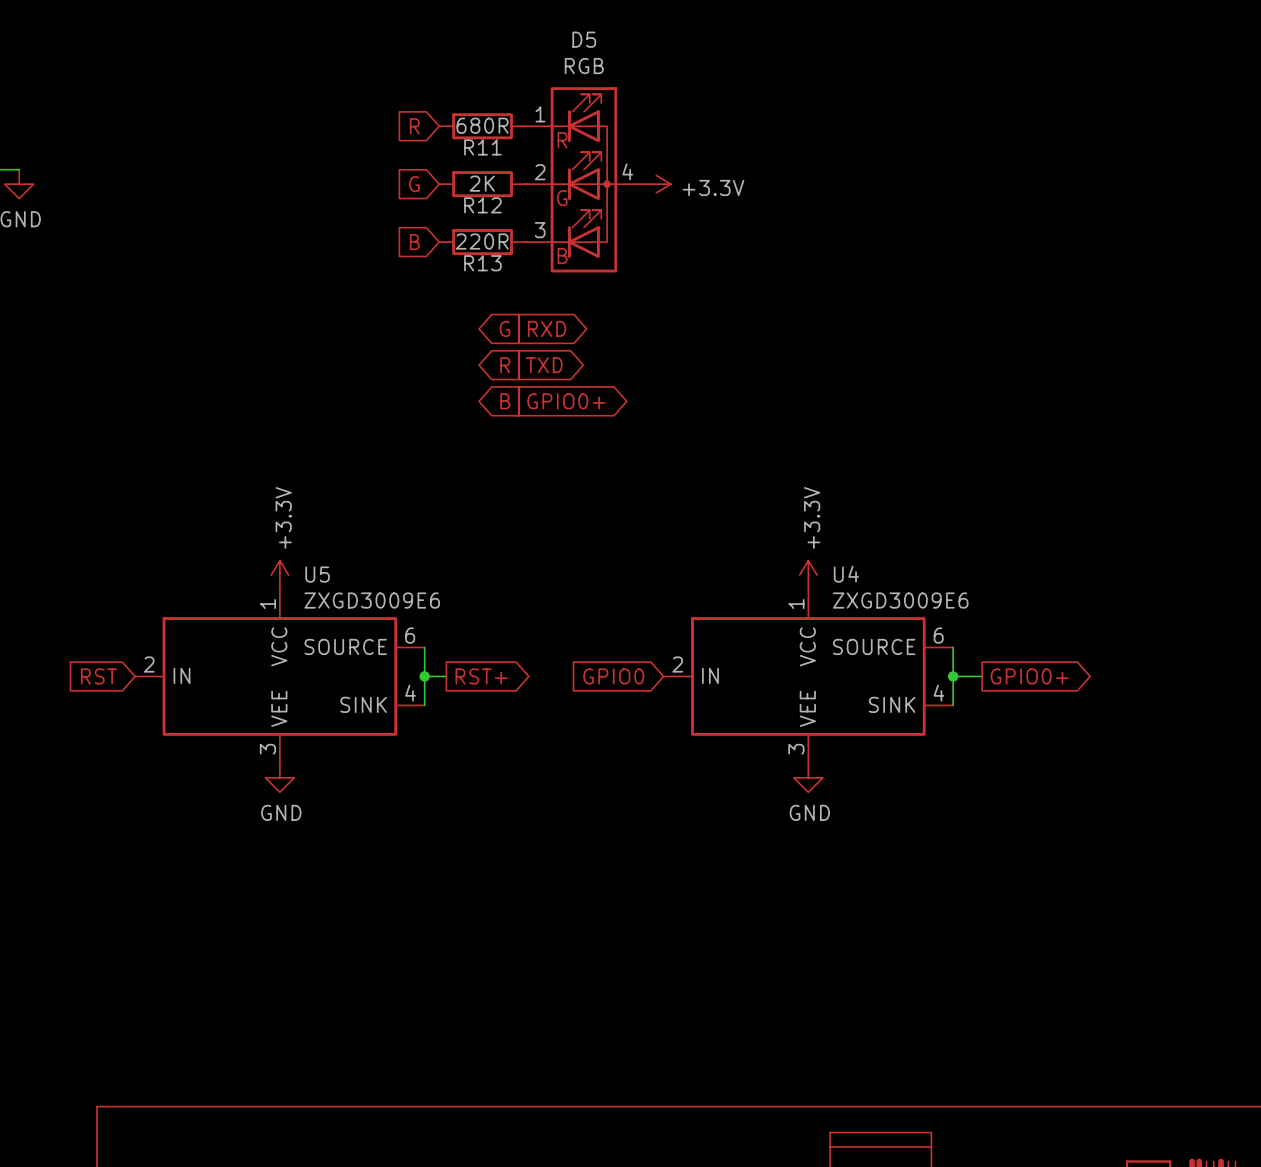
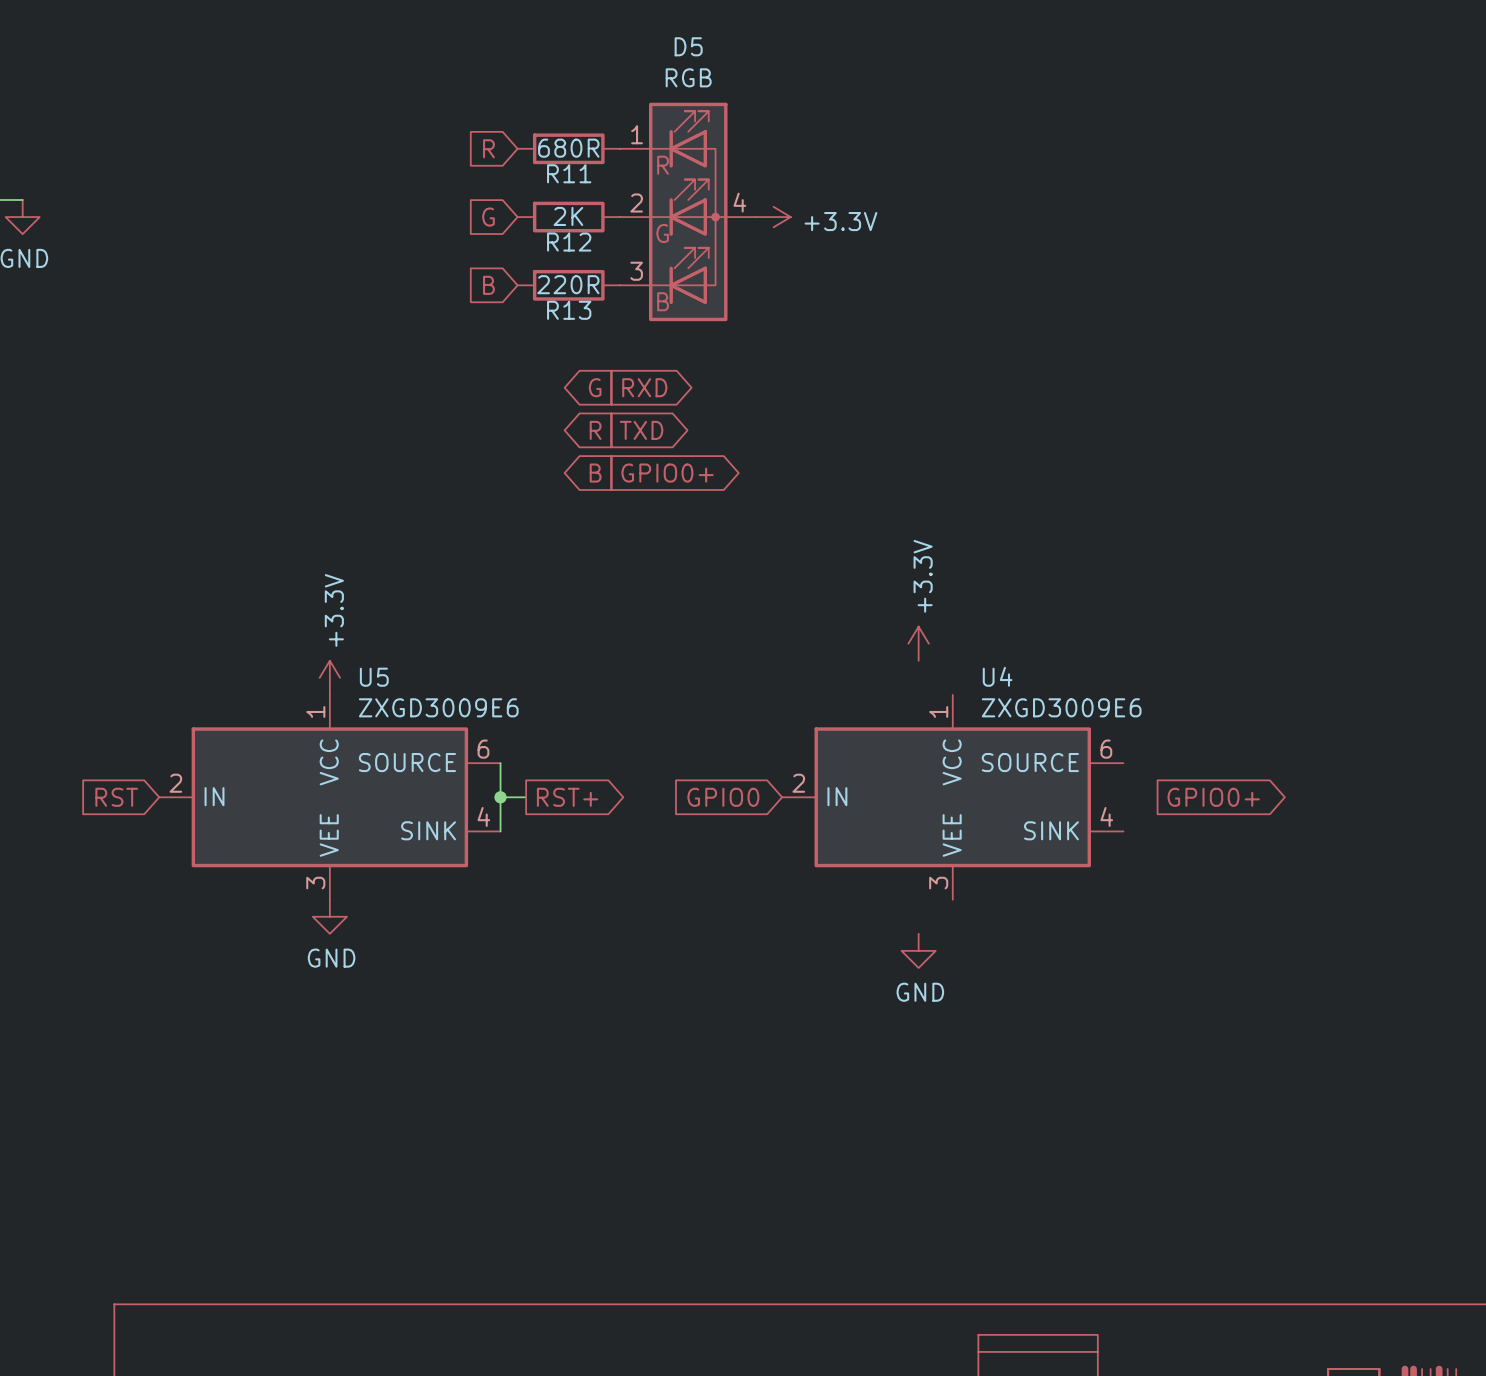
power symbol position: +3.3V (808, 575) -> +3.3V (918, 643)
wire: (953, 647) (953, 705) -> none
wire: (953, 676) (982, 676) -> none
junction: (953, 676) -> none
power symbol position: GND (808, 777) -> GND (918, 950)

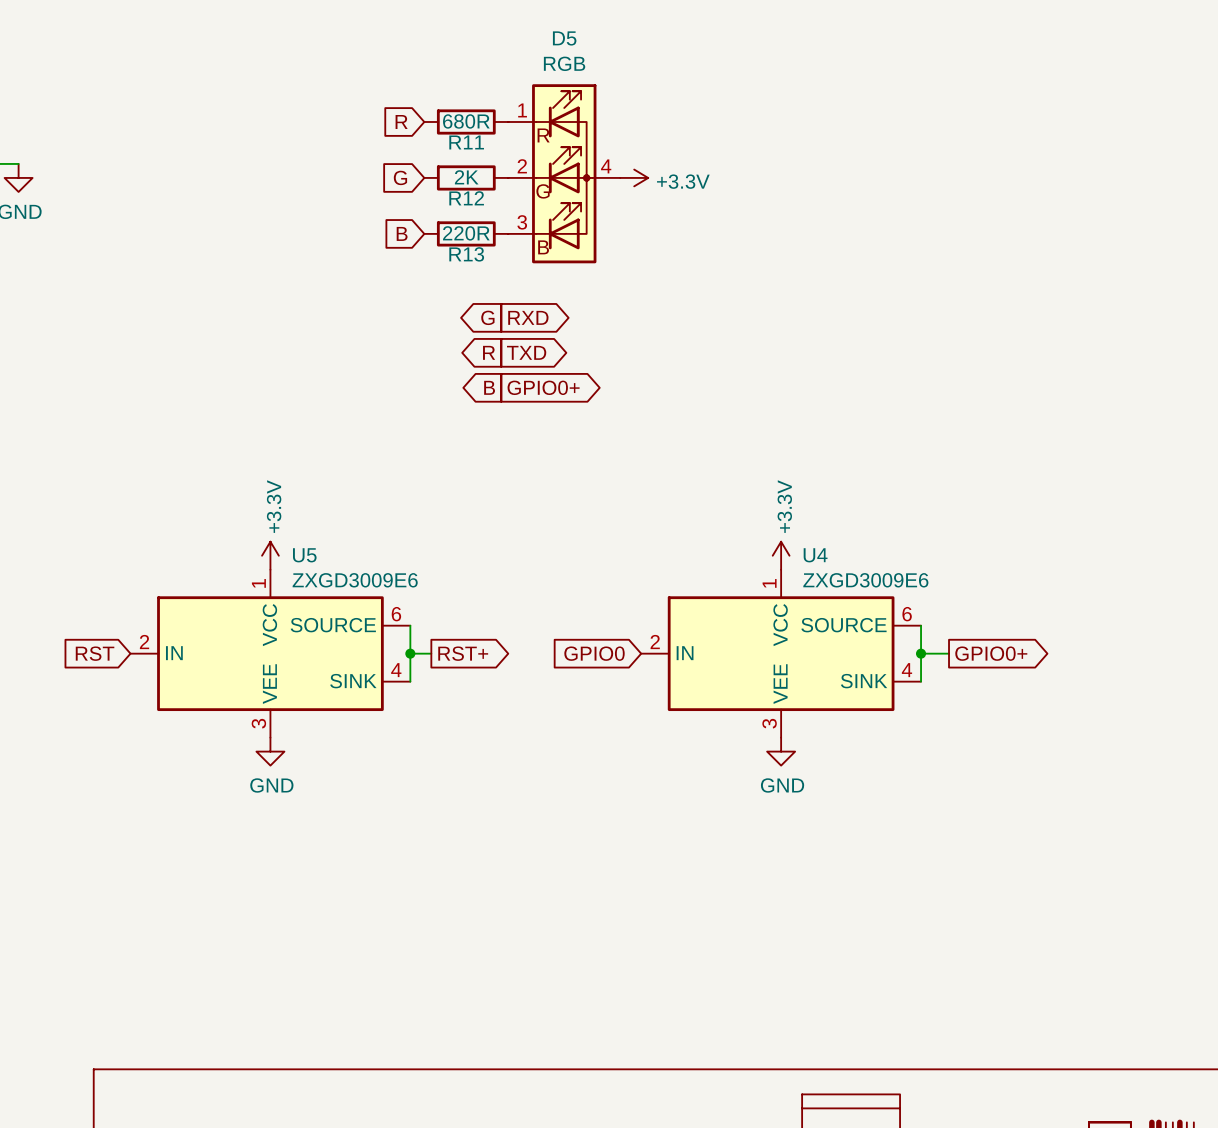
power symbol position: +3.3V (918, 643) -> +3.3V (781, 555)
wire: none -> (921, 625) (921, 681)
wire: none -> (921, 653) (949, 653)
junction: none -> (921, 653)
power symbol position: GND (918, 950) -> GND (781, 751)

